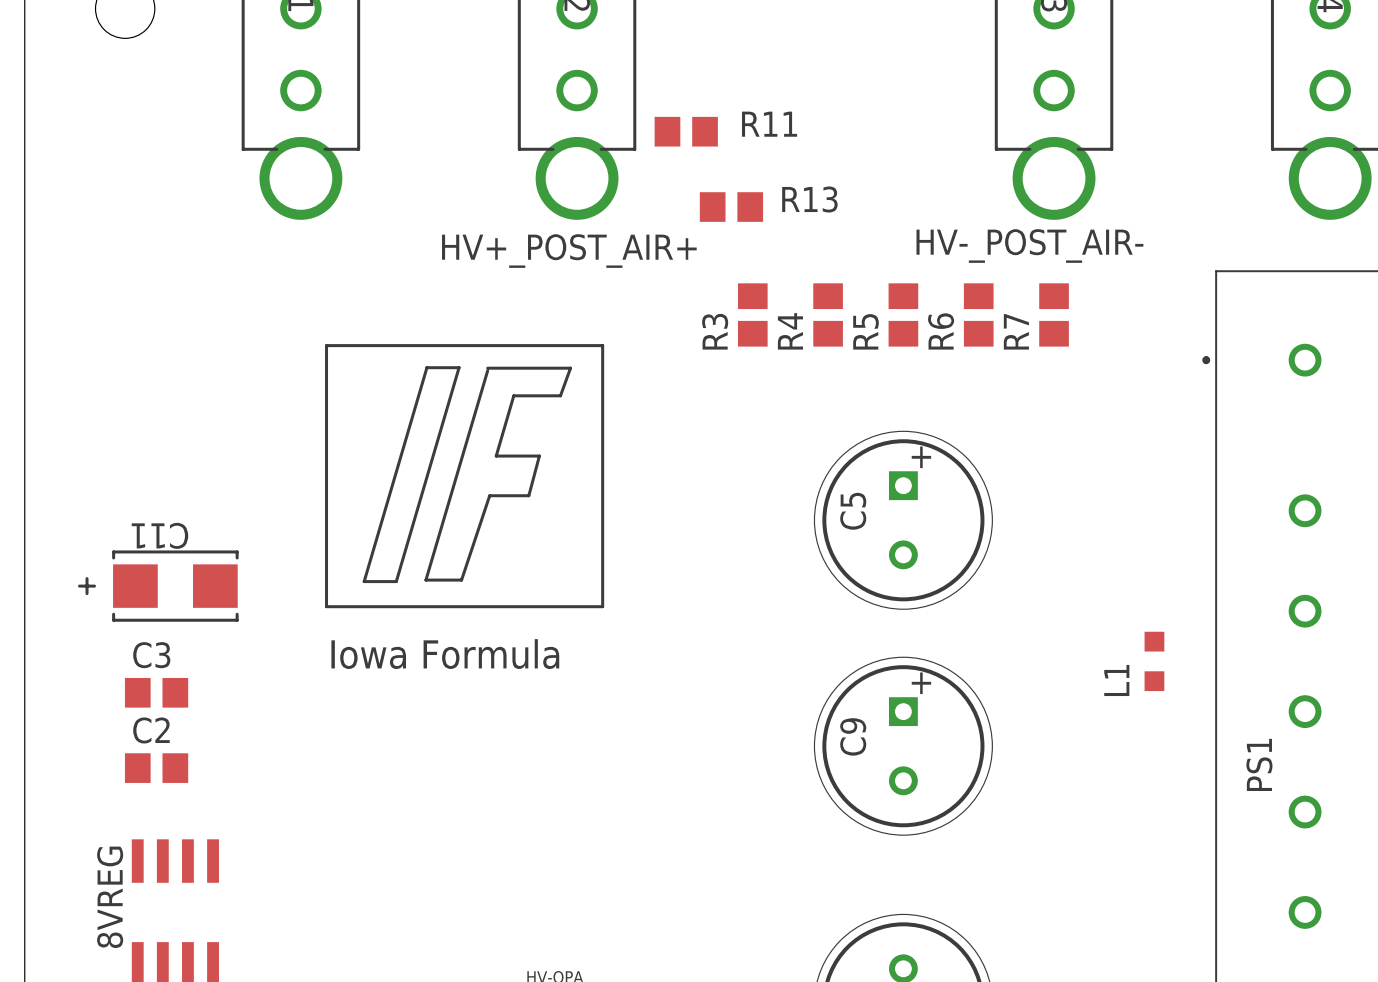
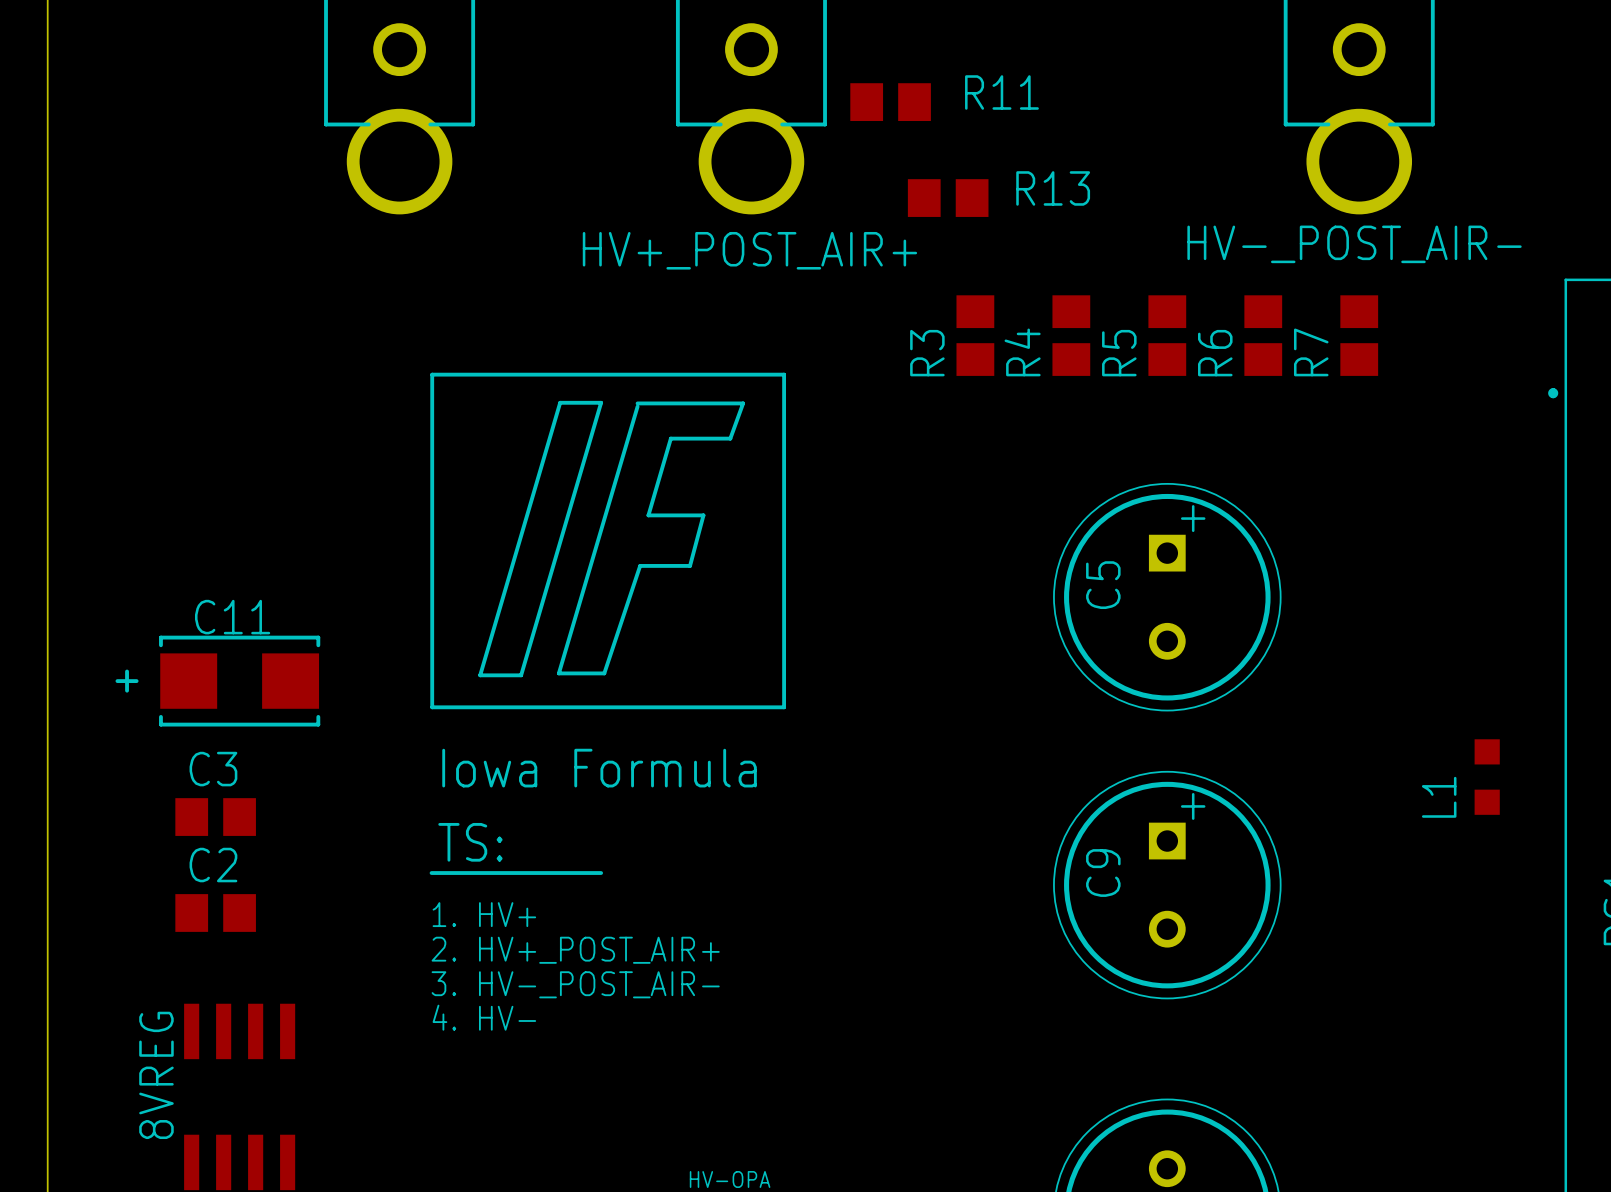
C11 name rotation: 0° (159, 535) -> 180° (232, 617)
text: none -> TS: (470, 842)
line: none -> (431, 873) (601, 873)
text: none -> 1. HV+ (484, 914)
text: none -> 2. HV+_POST_AIR+ (575, 950)
text: none -> 3. HV-_POST_AIR- (575, 984)
text: none -> 4. HV- (484, 1017)

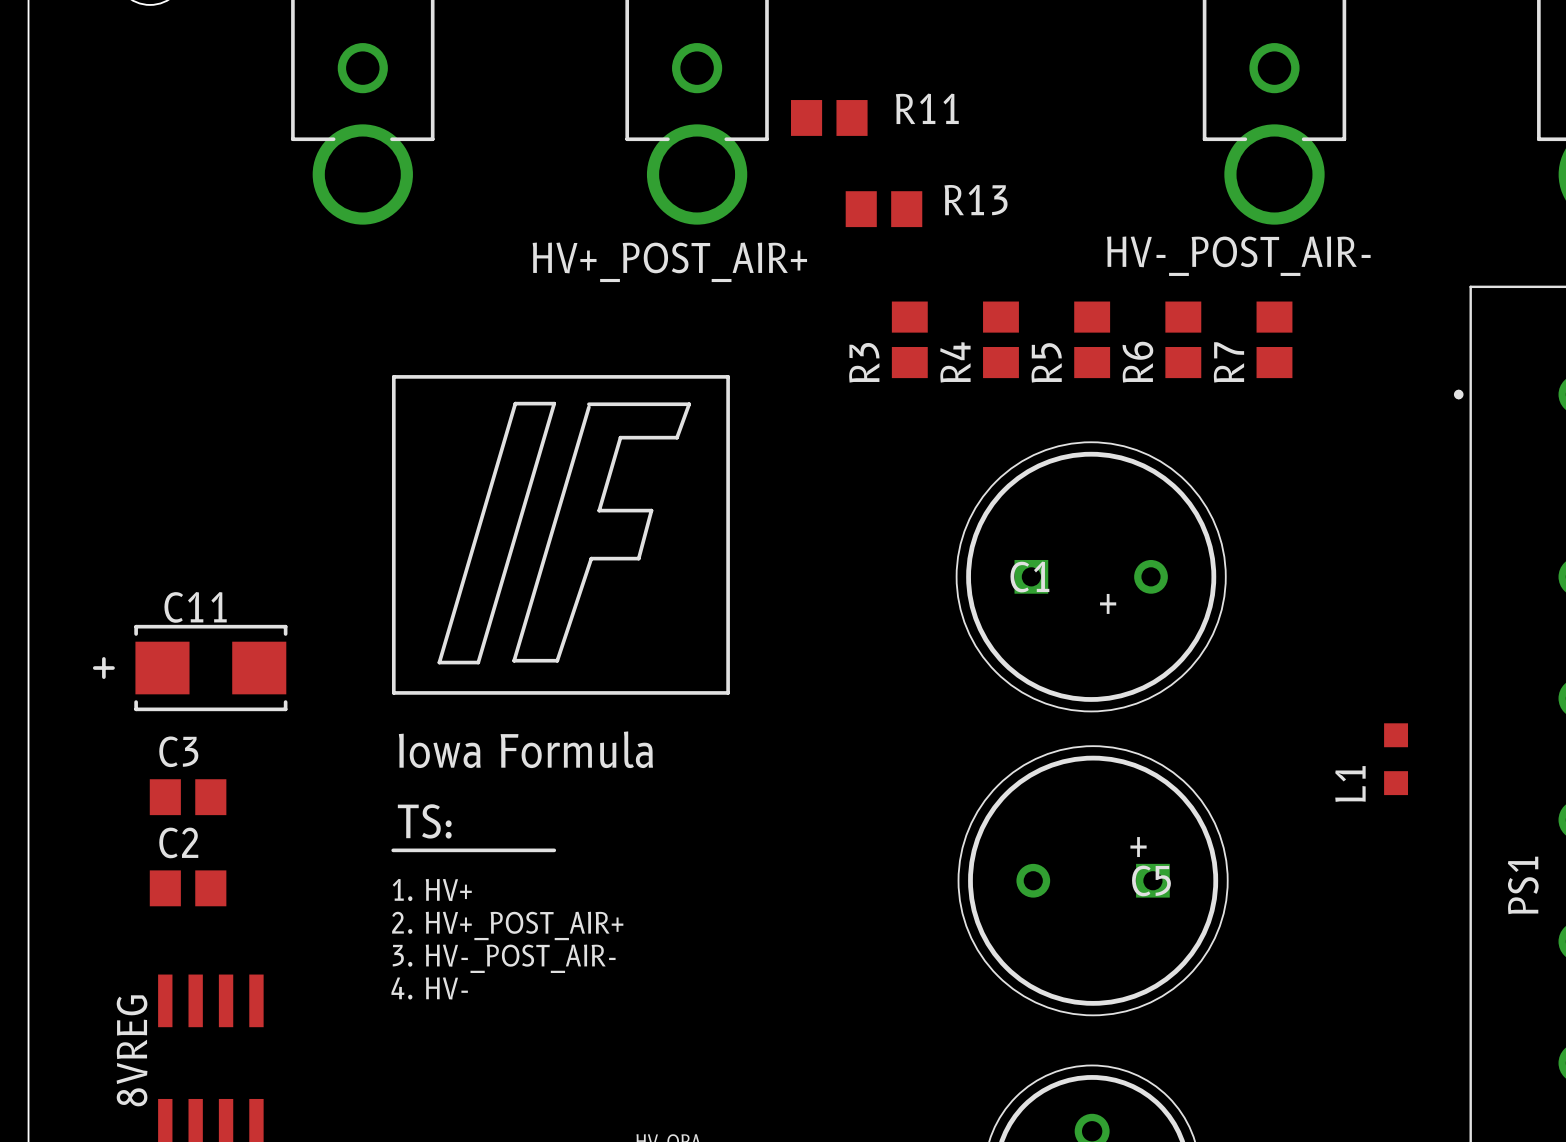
C5 footprint: [1053, 483, 1282, 712] -> [957, 745, 1229, 1016]
text: + (1193, 518) -> none
C5 name position: C5 (1103, 585) -> C5 (1151, 880)
C1: none -> (1091, 576)
text: none -> + (1108, 603)
text position: + (1193, 806) -> + (1138, 847)
C9: (1167, 885) -> none

